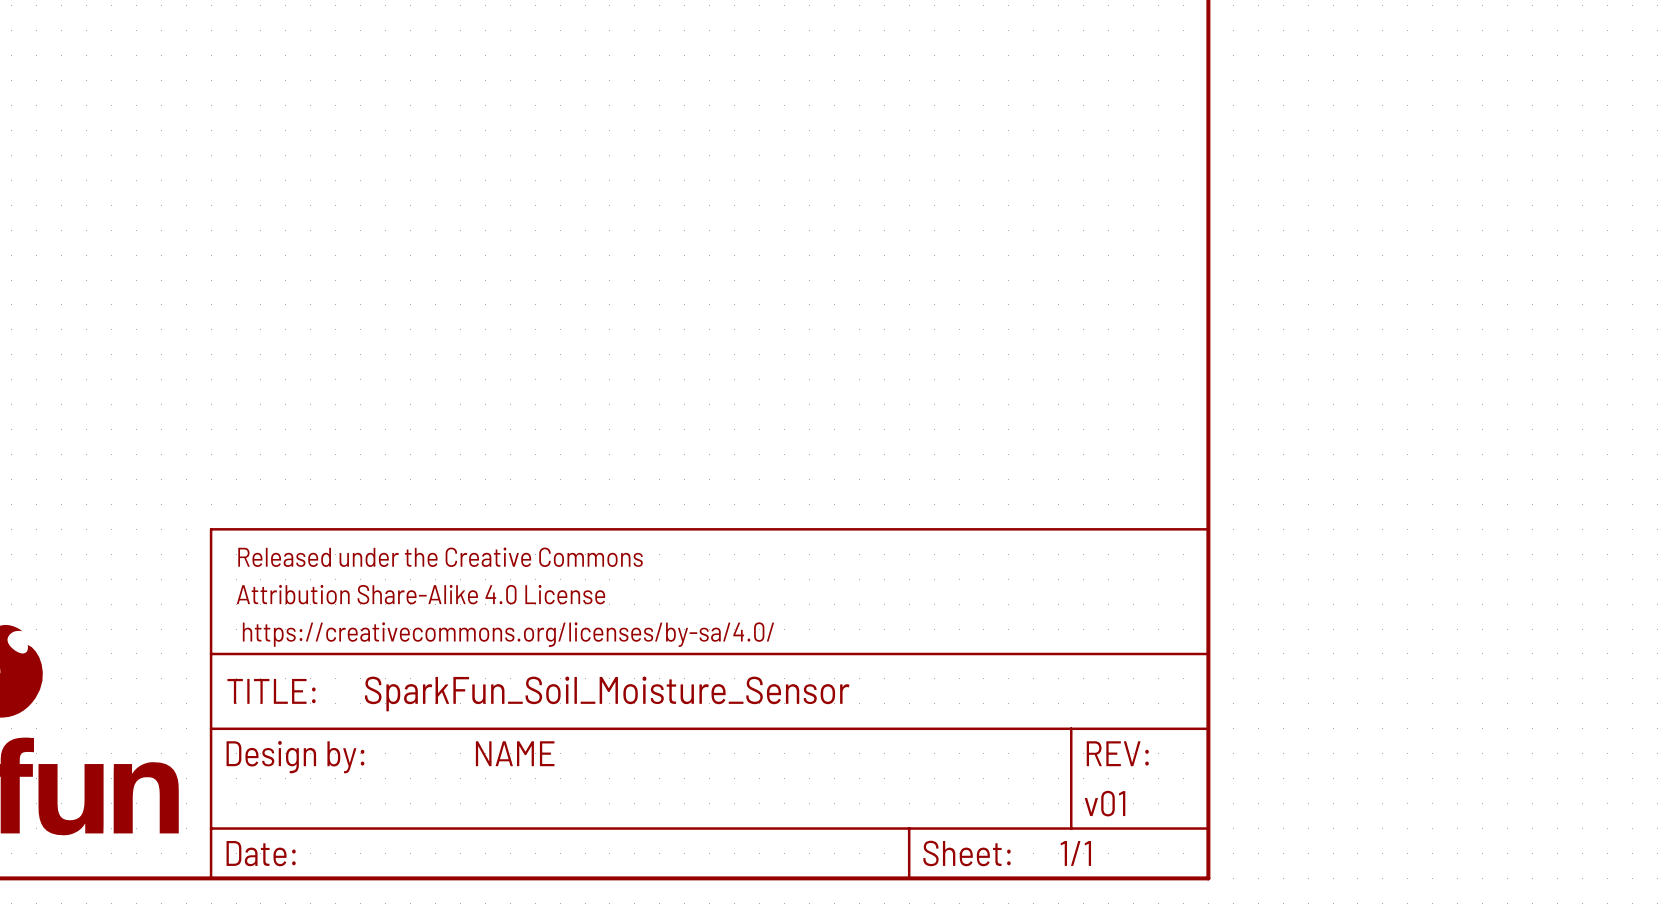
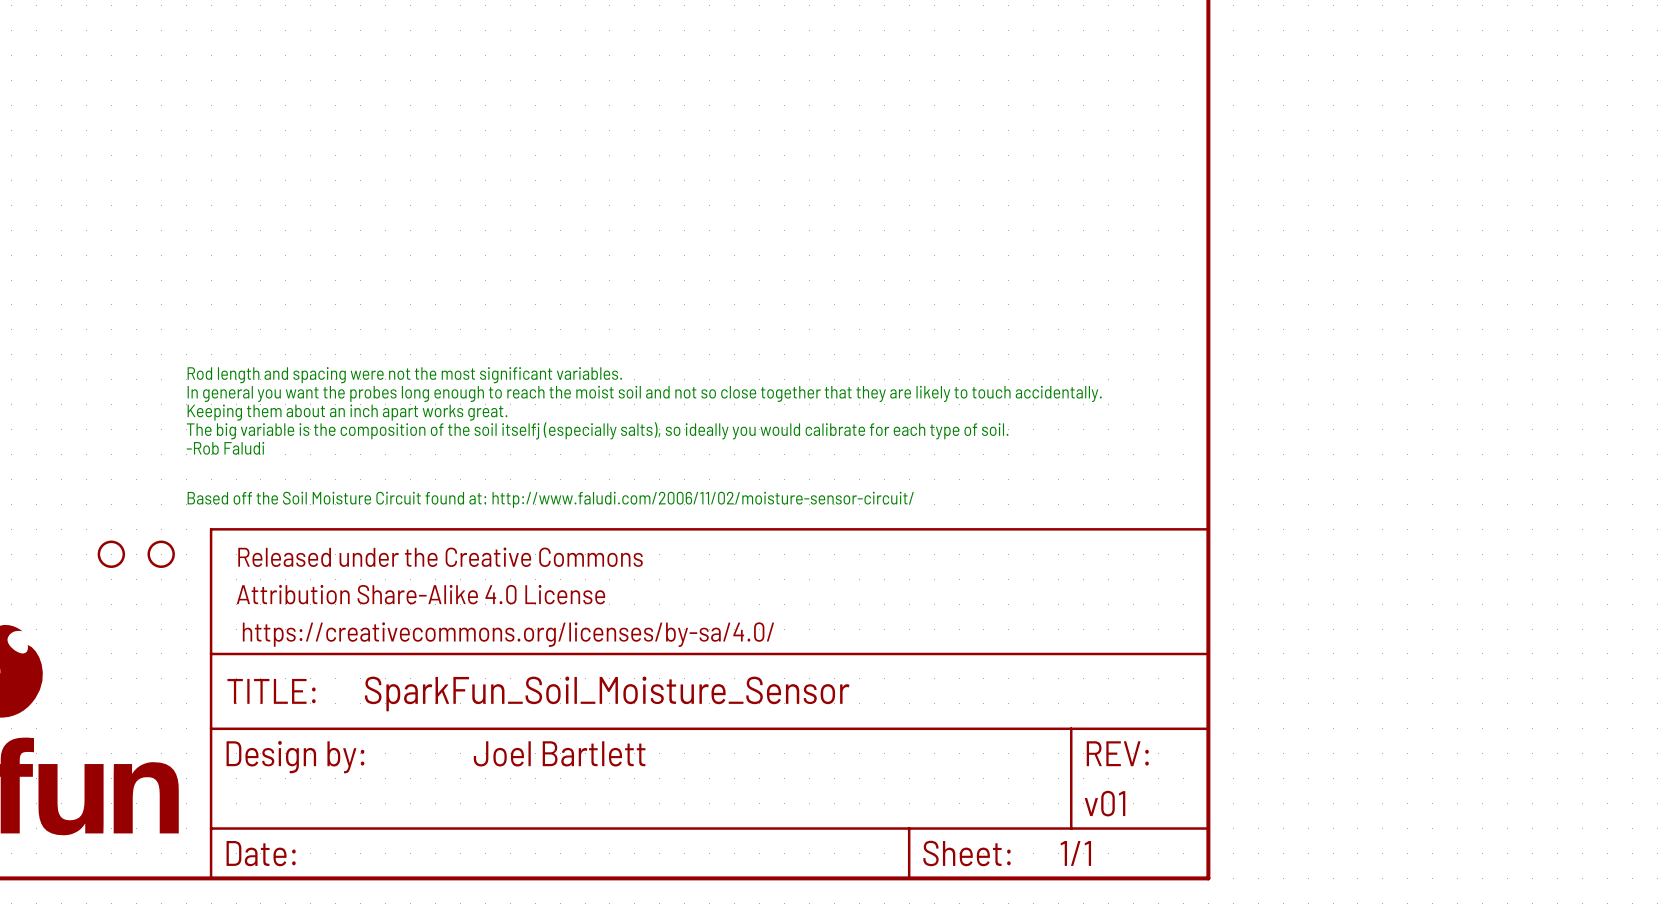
text: none -> Rod length and spacing were not the most significant variables. (404, 375)
text: none -> In general you want the probes long enough to reach the moist soil and not so close together that they are likely to touch accidentally. (644, 393)
text: none -> Keeping them about an inch apart works great. (347, 412)
text: none -> The big variable is the composition of the soil itselfj (especially salts), so ideally you would calibrate for each type of soil. (597, 430)
text: none -> -Rob Faludi (225, 448)
text: none -> Based off the Soil Moisture Circuit found at: http://www.faludi.com/2006/11/02/moisture-sensor-circuit/ (550, 499)
part: none -> (111, 554)
part: none -> (161, 554)
part text: NAME (515, 753) -> Joel Bartlett (559, 753)

